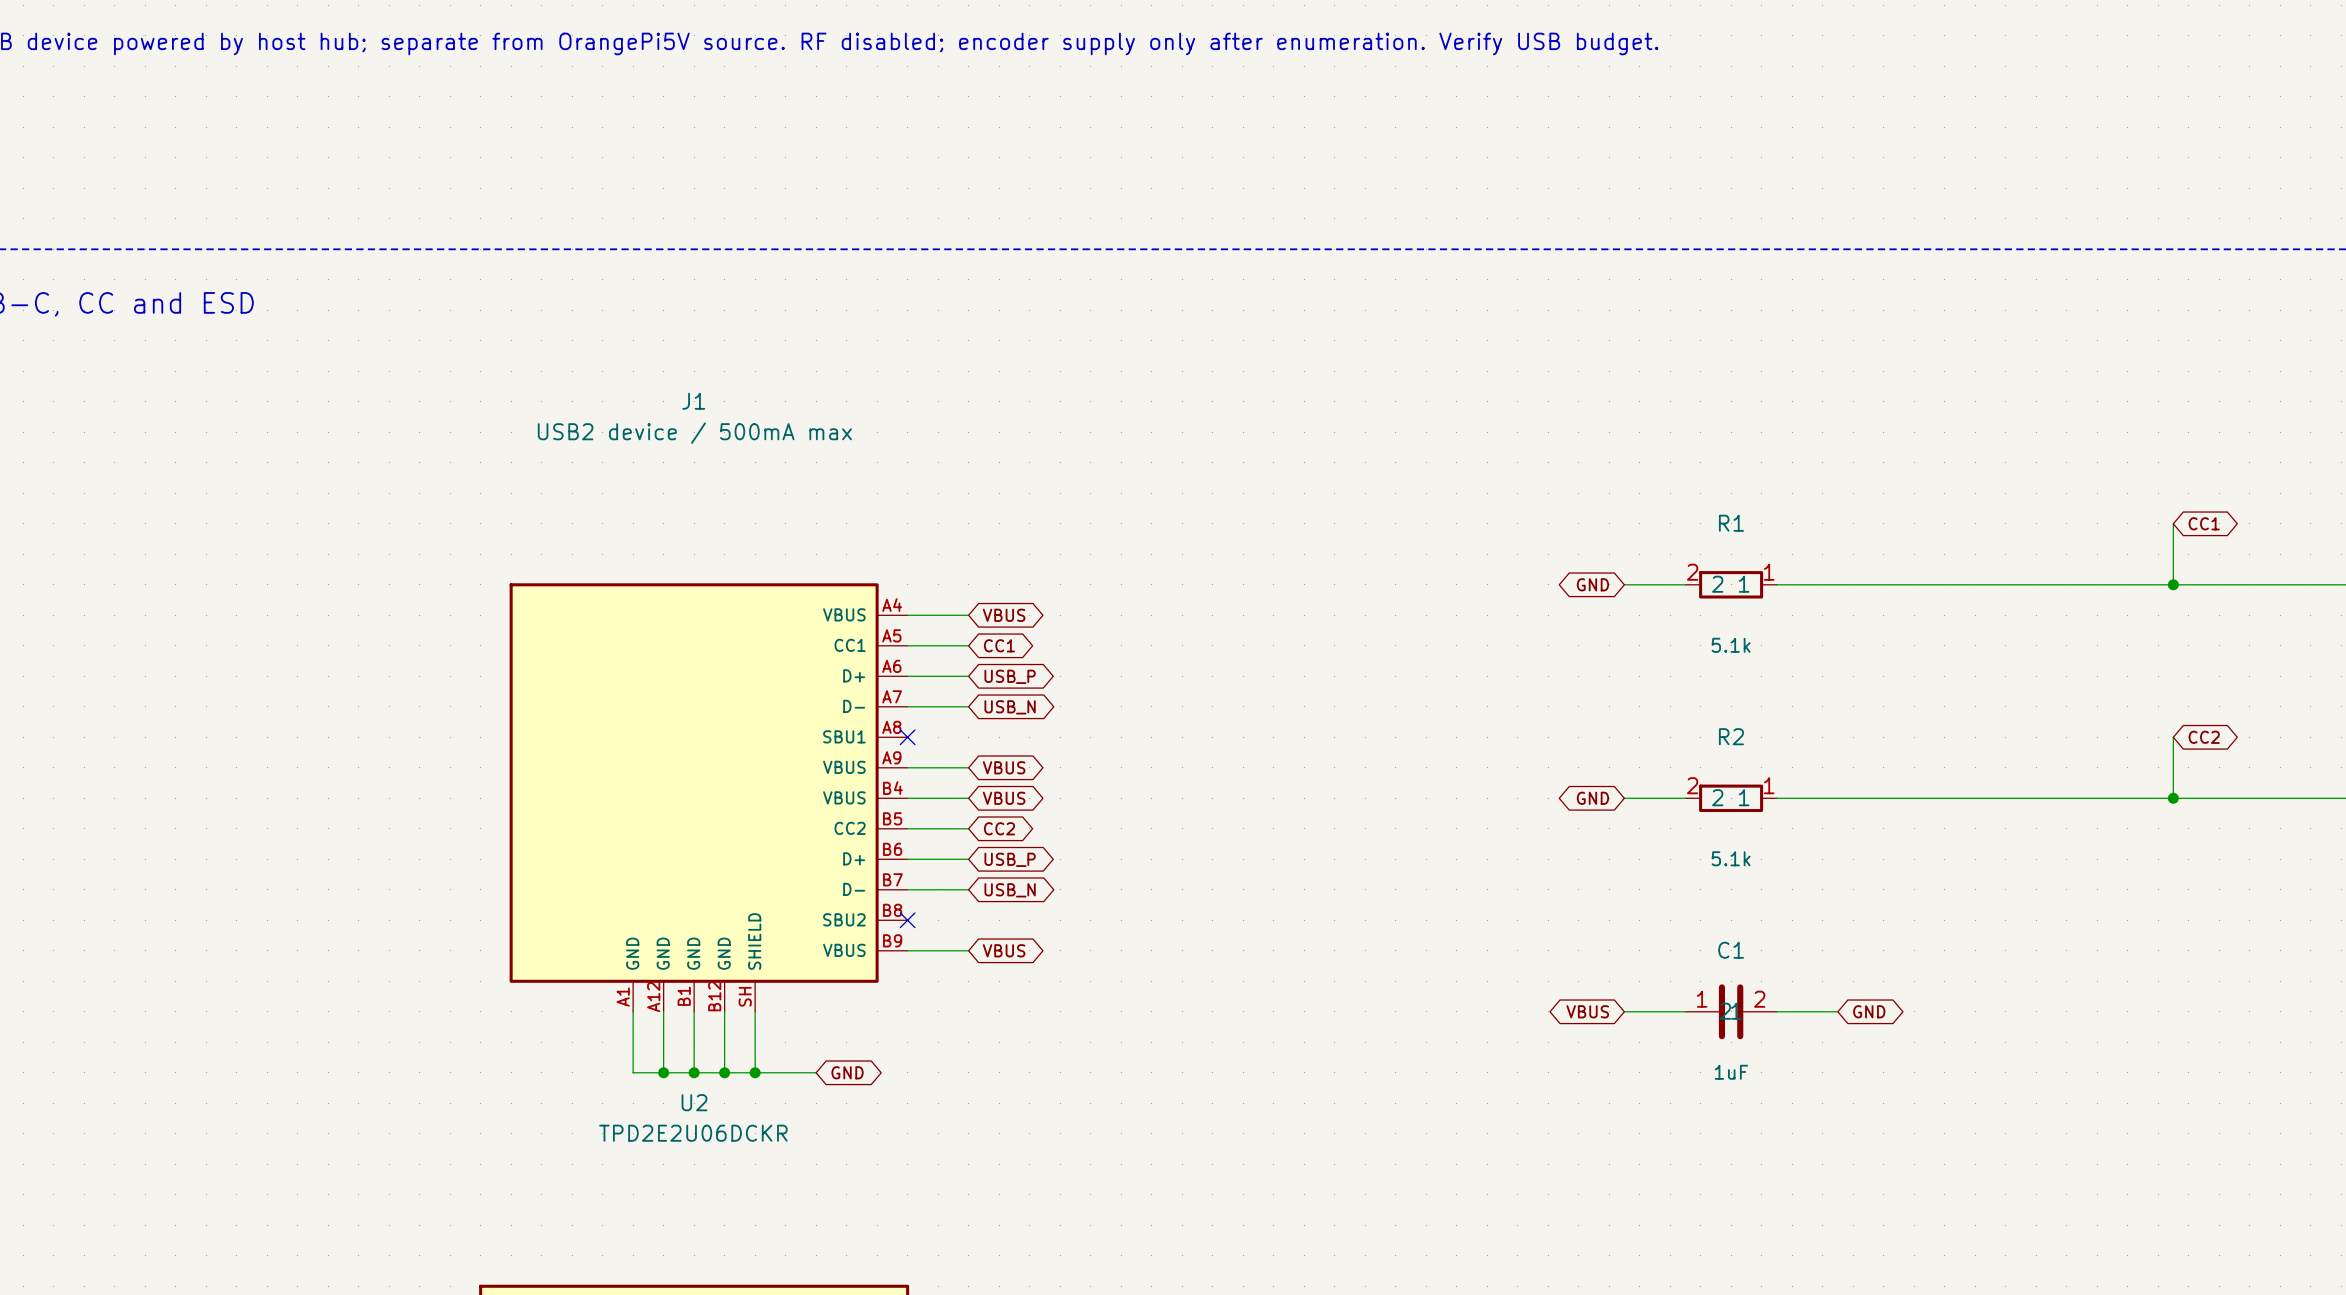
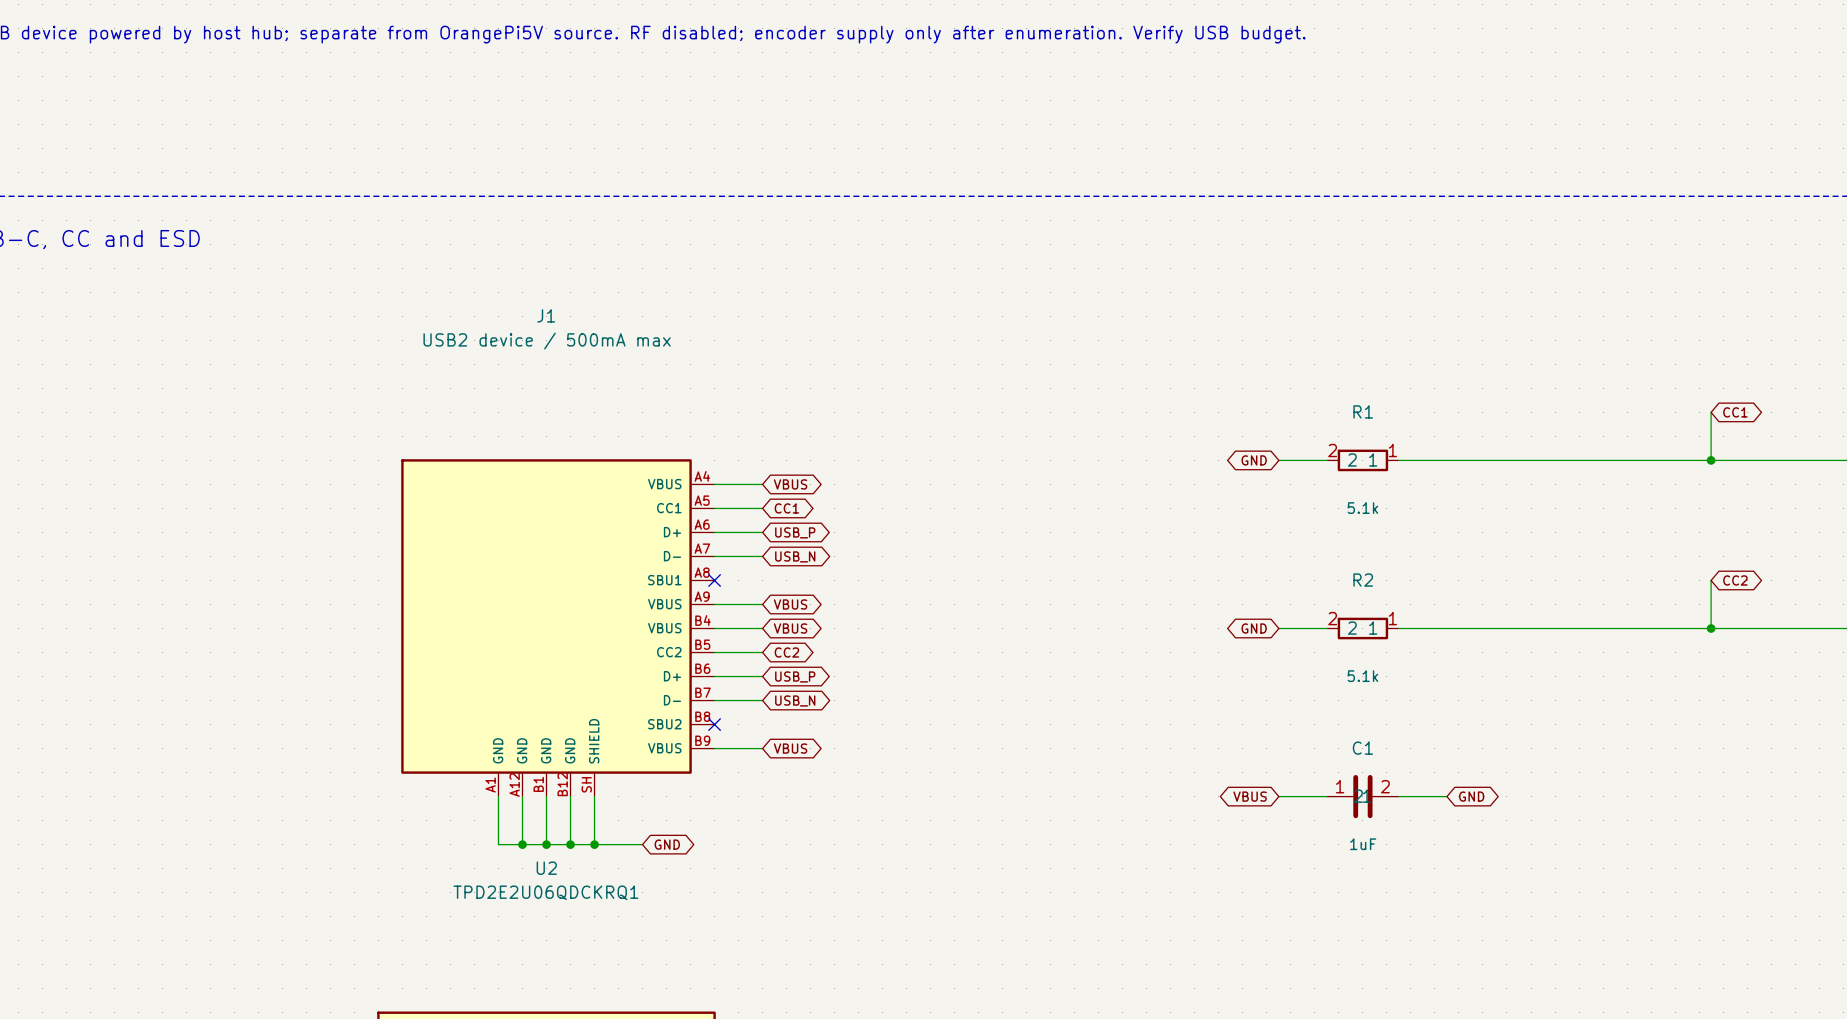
U2 value: TPD2E2U06DCKR (693, 1133) -> TPD2E2U06QDCKRQ1 (545, 892)

